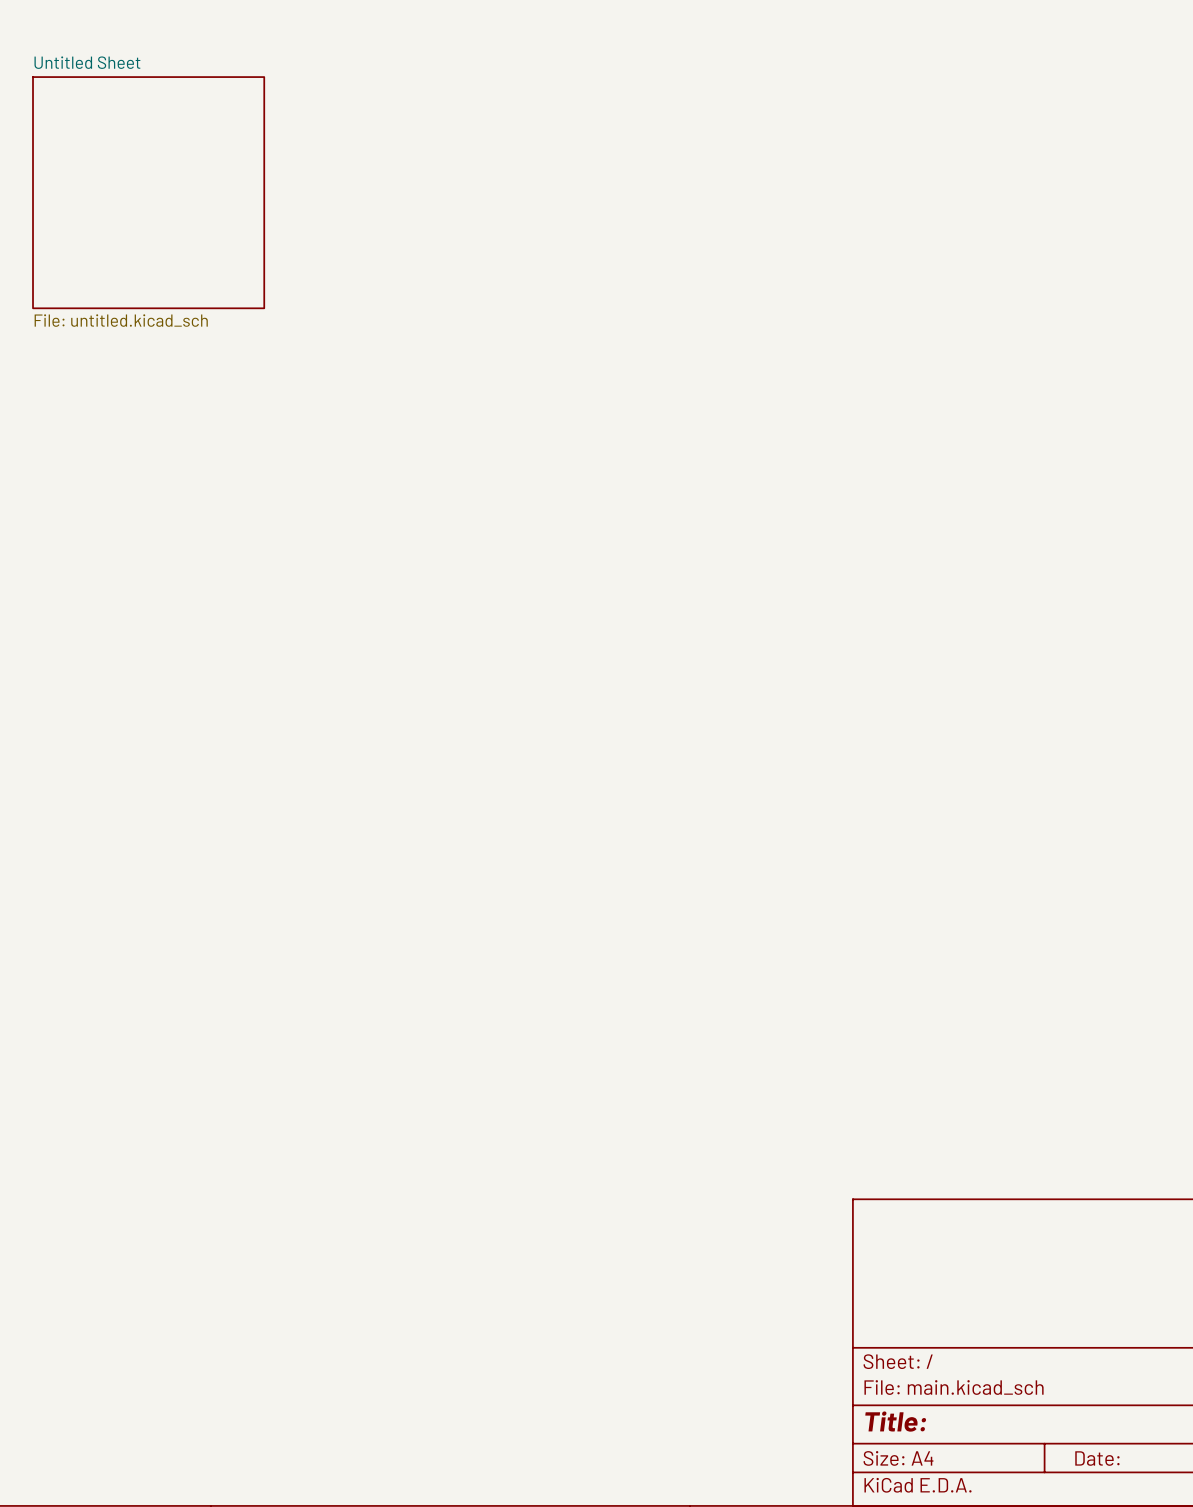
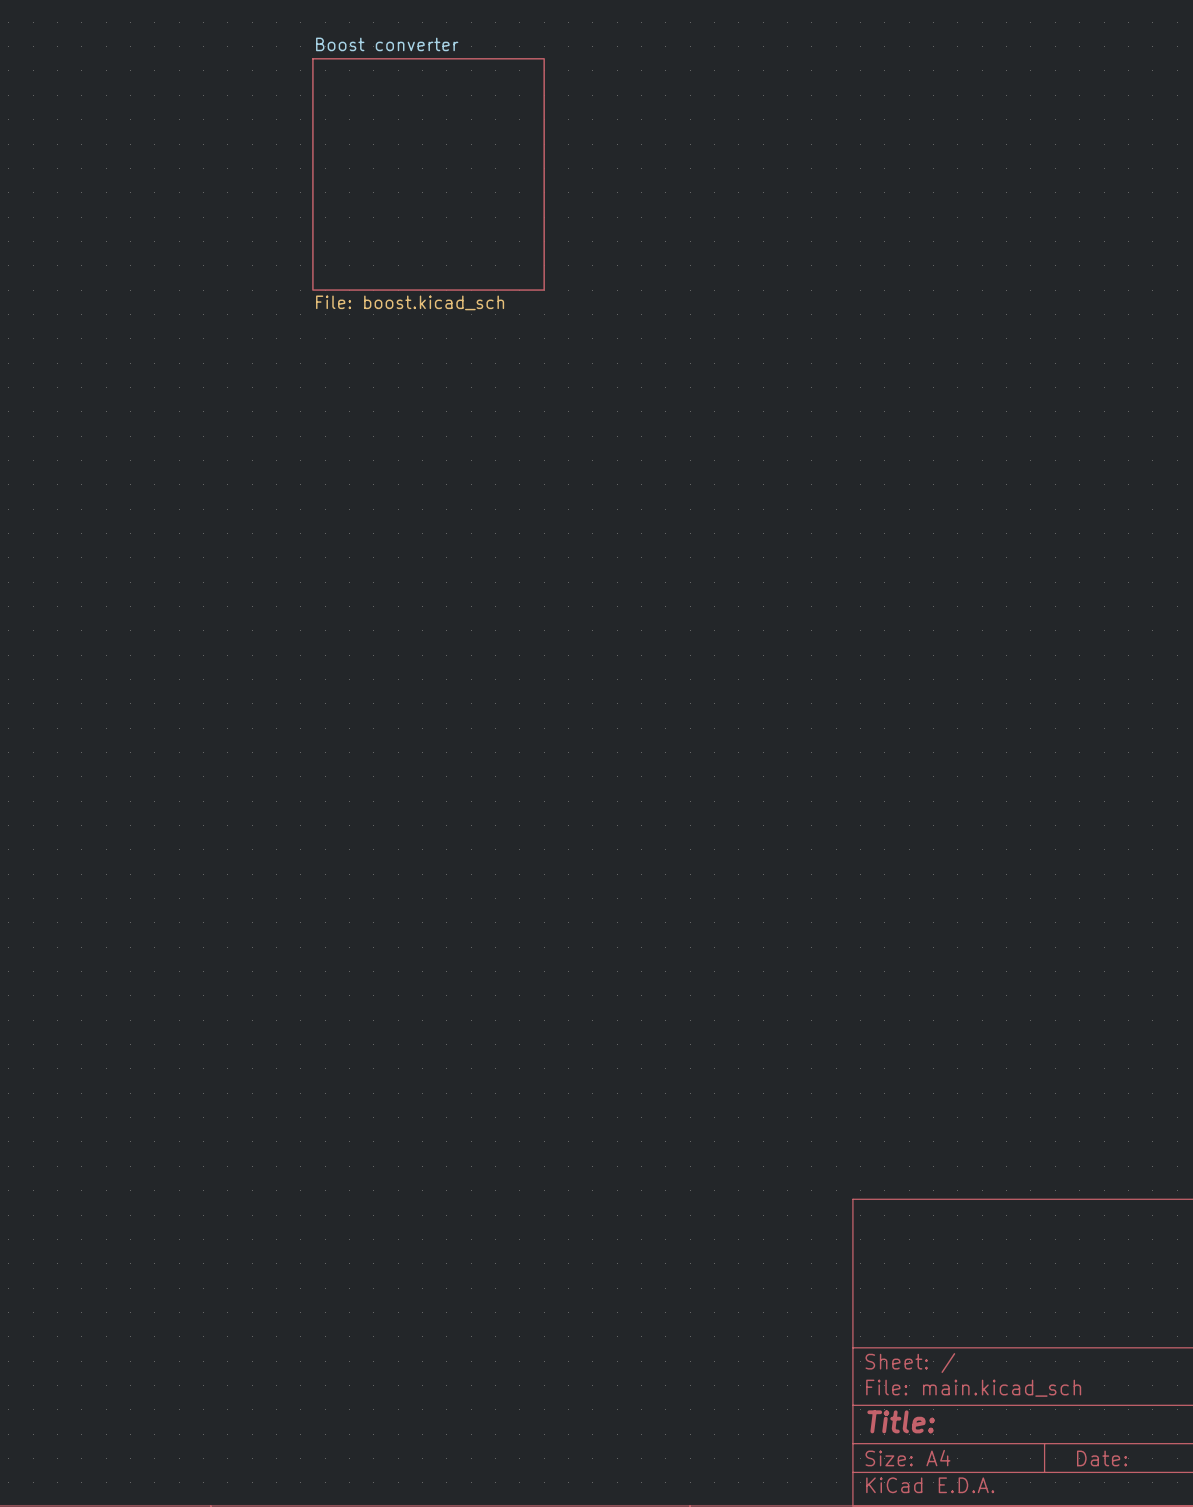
sheet Boost converter: none -> File: boost.kicad_sch (428, 174)
sheet Untitled Sheet: File: untitled.kicad_sch (148, 192) -> none

